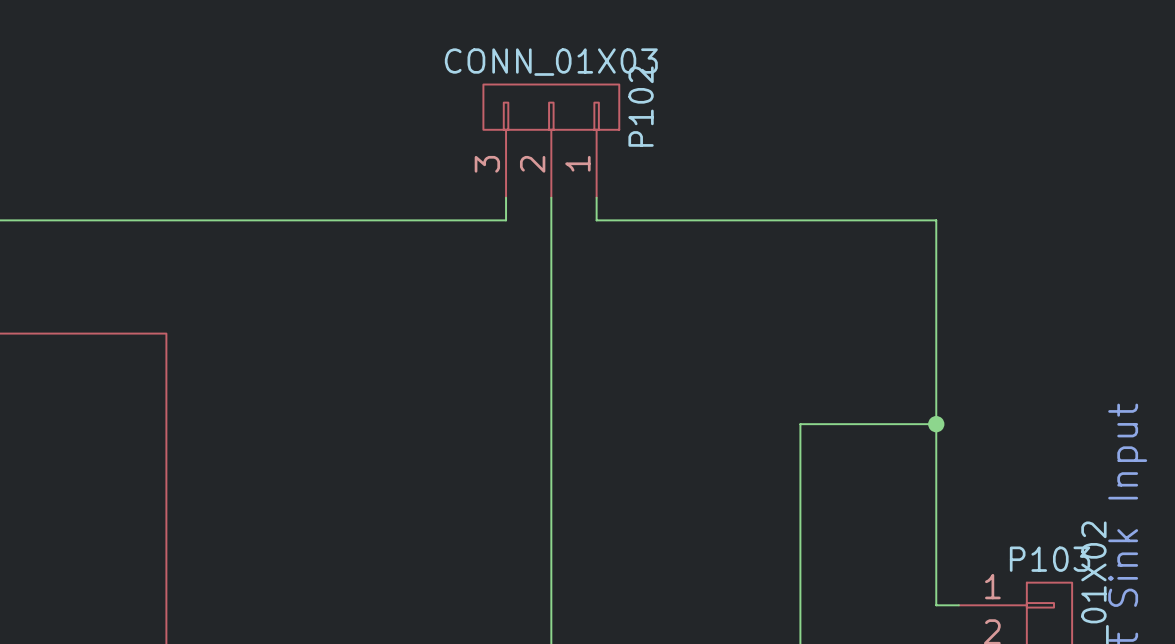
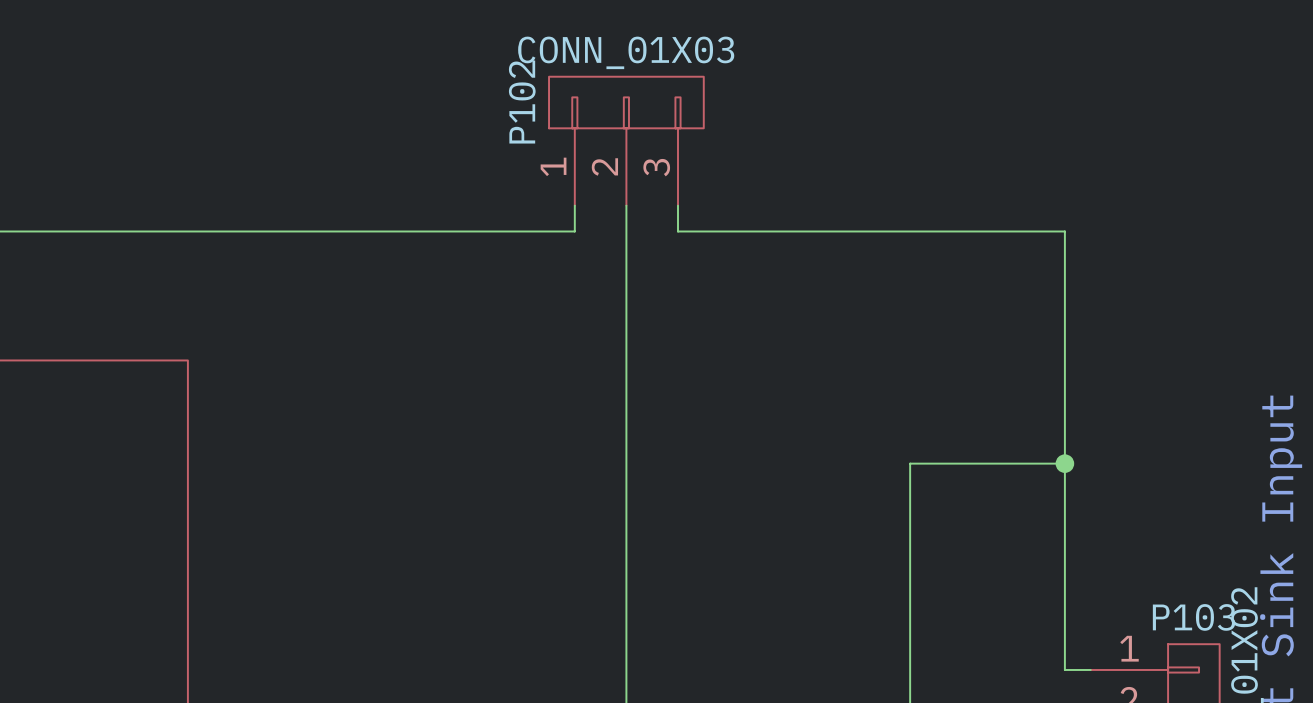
P102 flip: as is (551, 107) -> left-right (626, 102)

